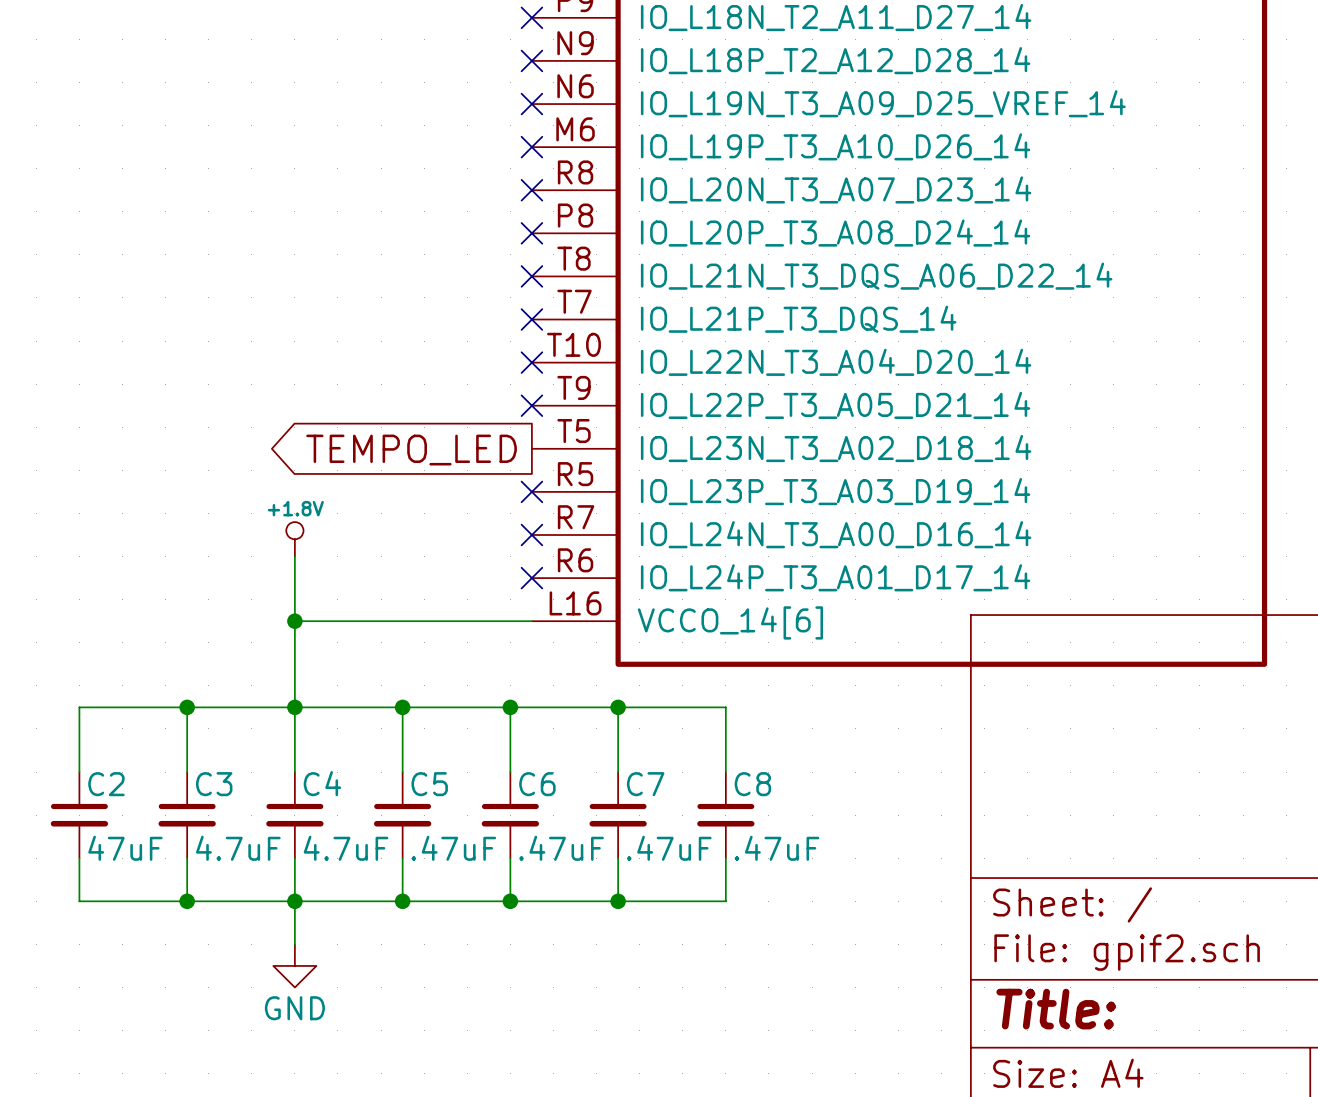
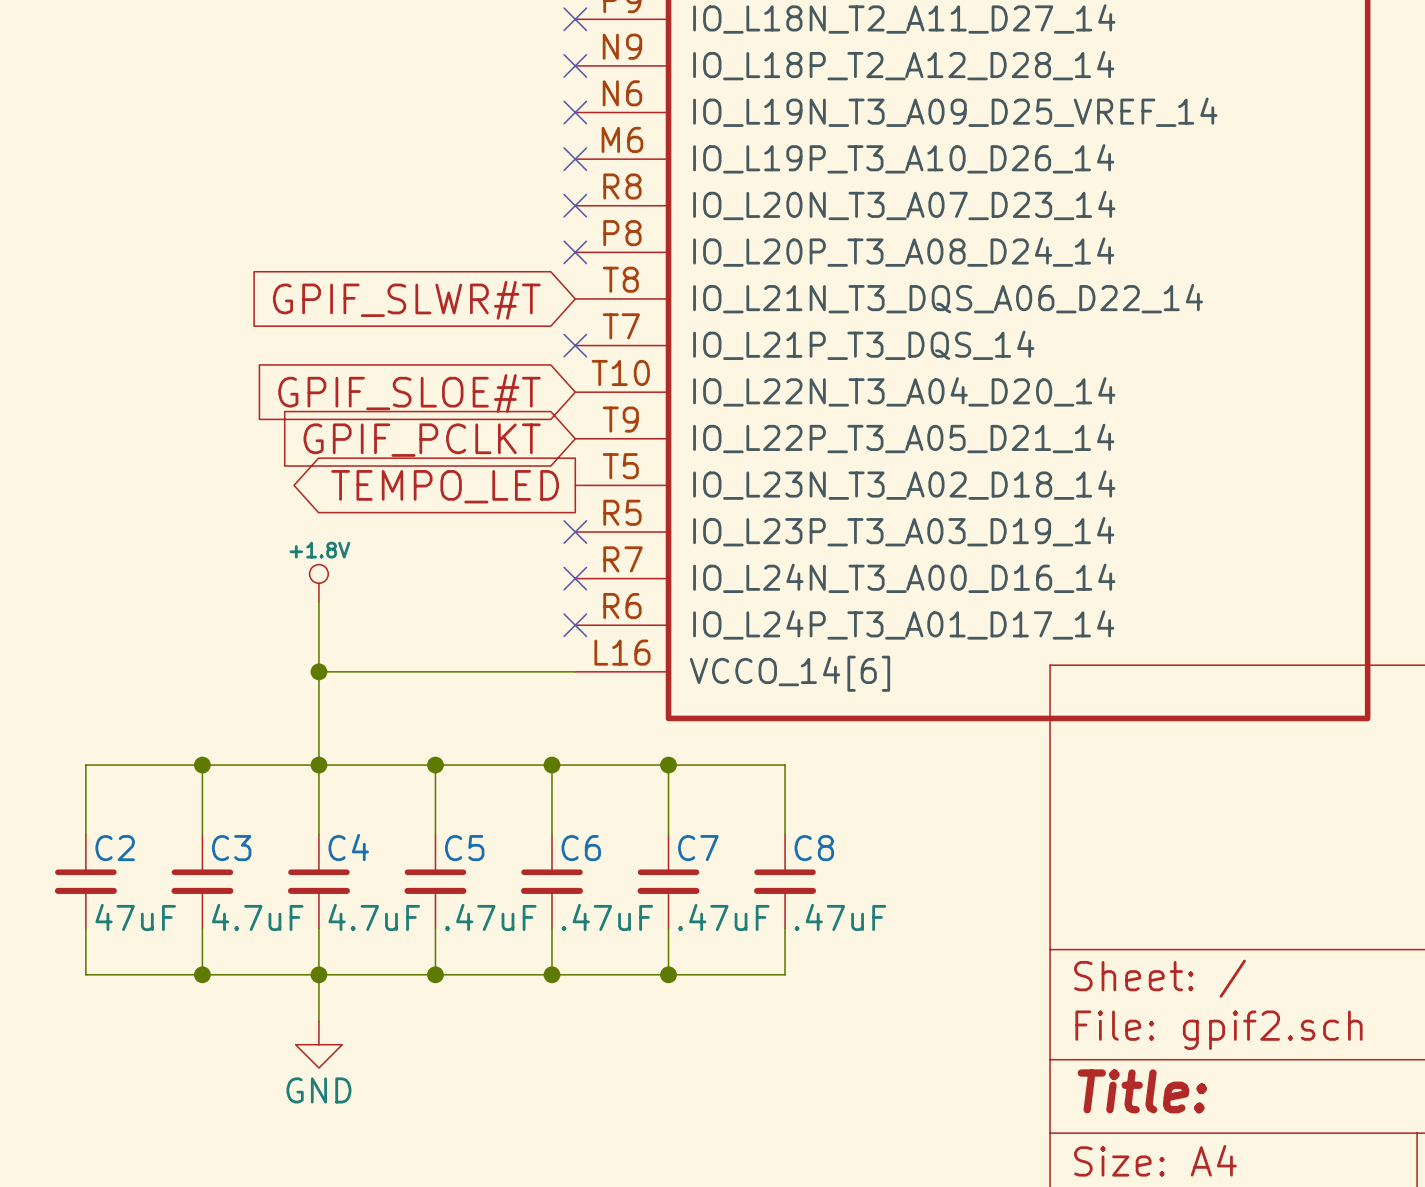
no-connect mark: (531, 276) -> none
global label: none -> GPIF_SLWR#T (406, 300)
no-connect mark: (531, 362) -> none
global label: none -> GPIF_SLOE#T (409, 393)
no-connect mark: (531, 405) -> none
global label: none -> GPIF_PCLKT (422, 440)

